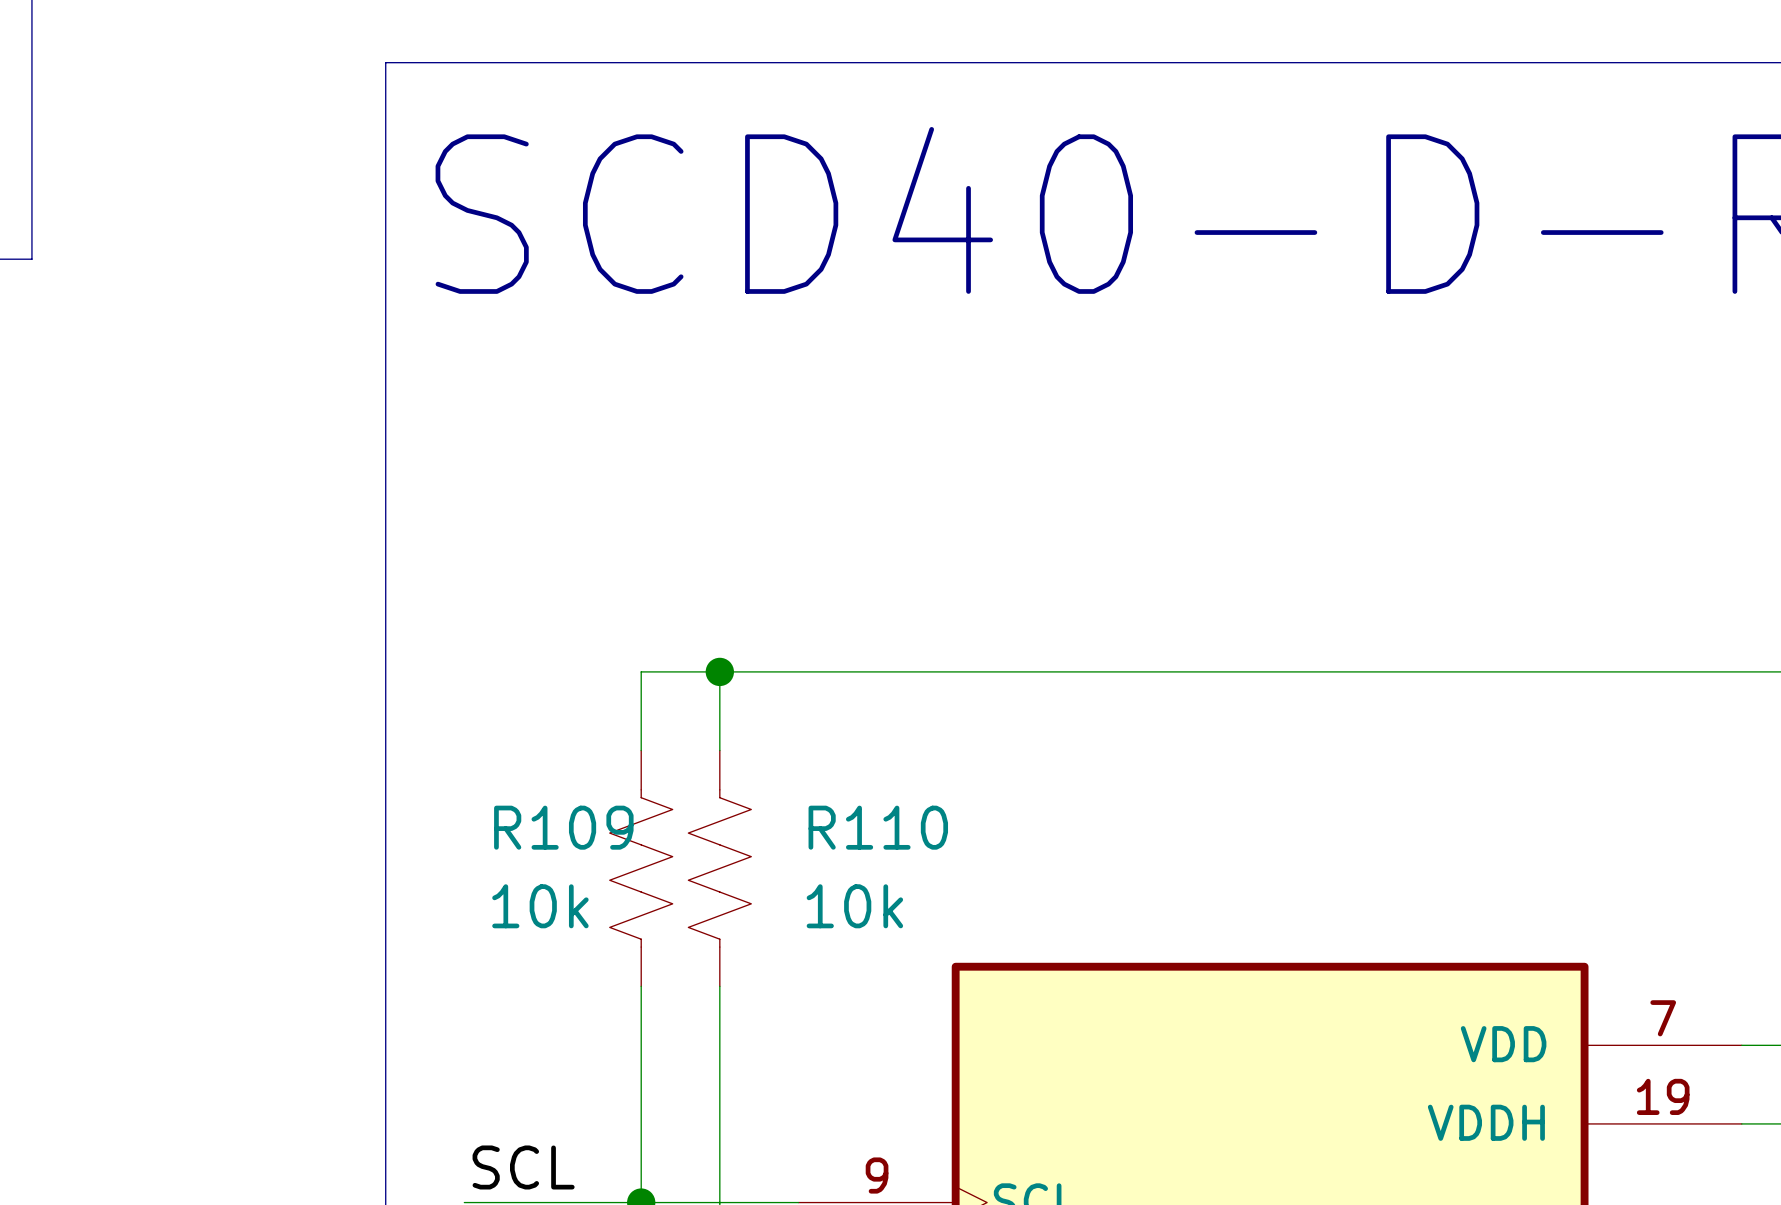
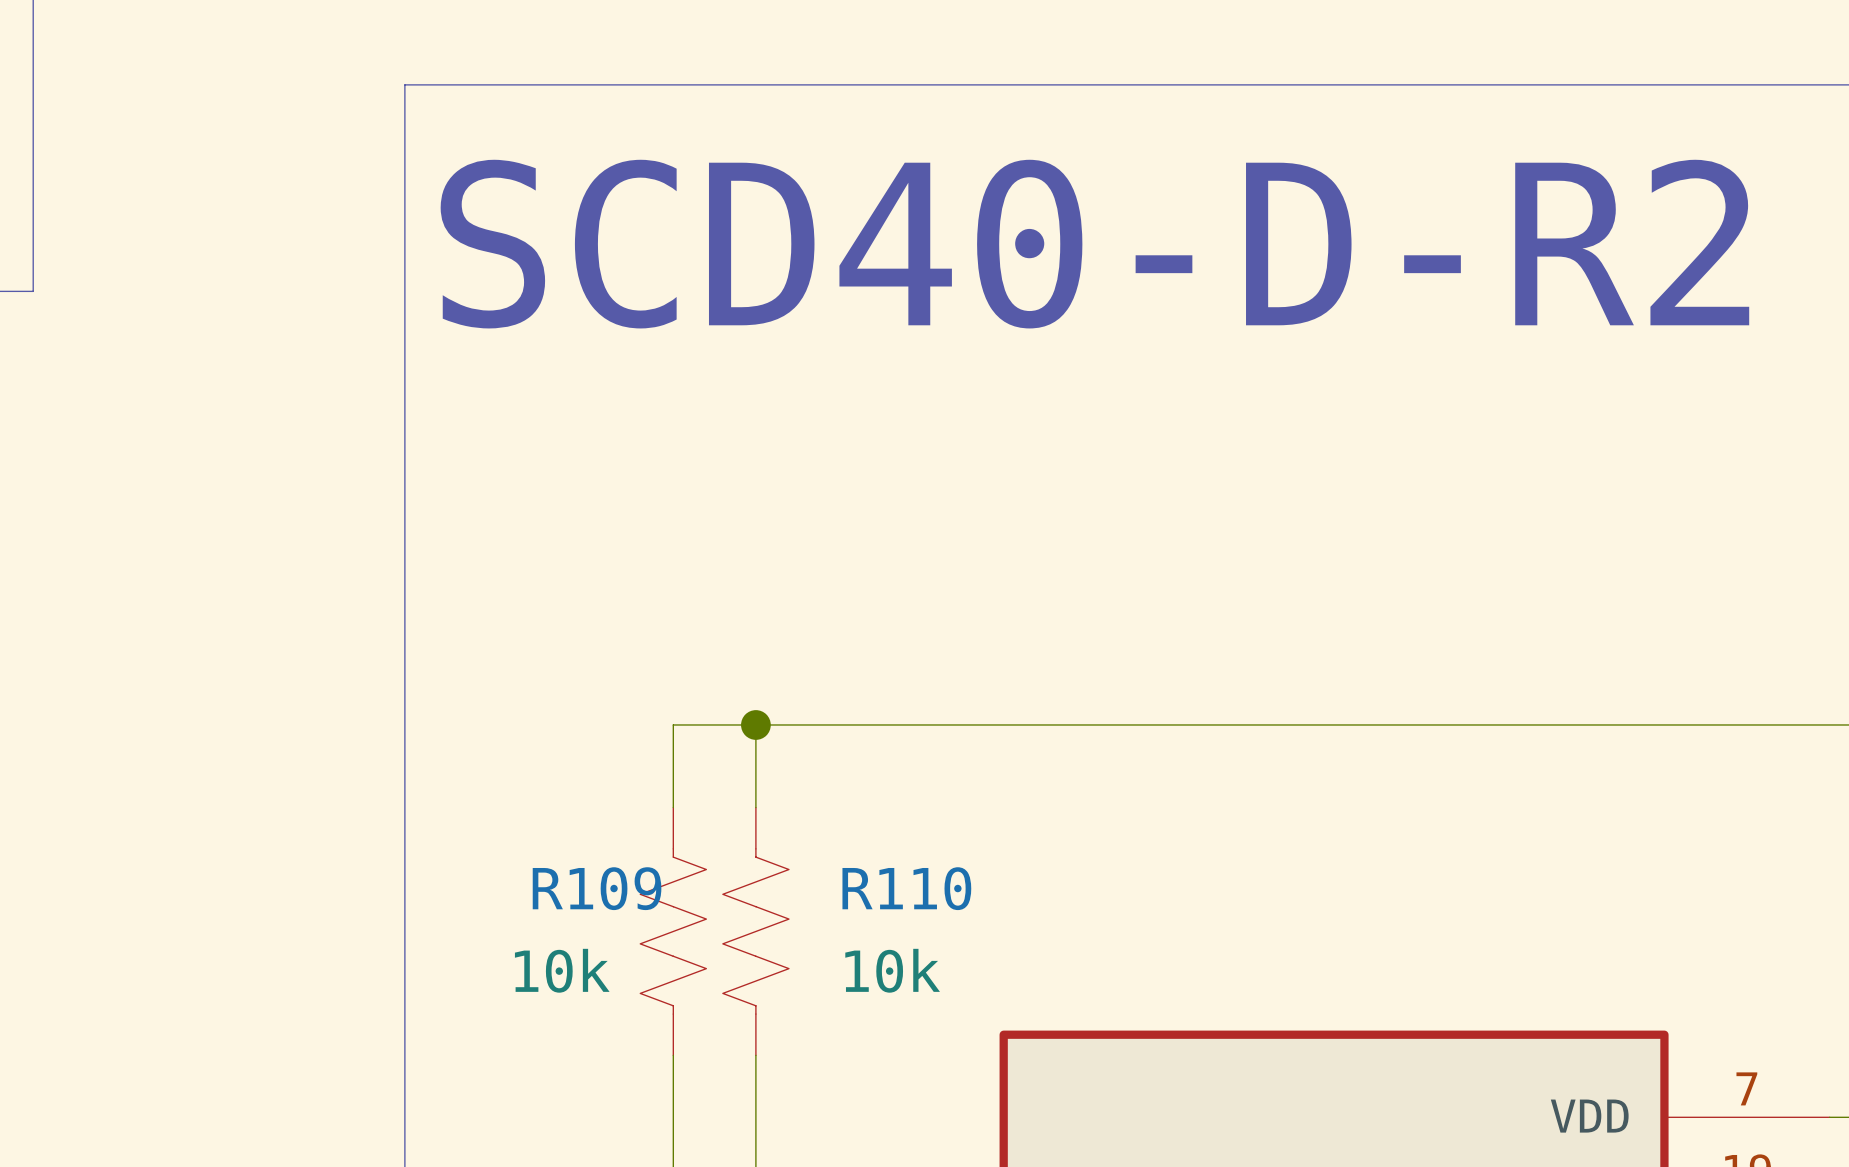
R109 name position: R109 (563, 827) -> R109 (597, 888)

